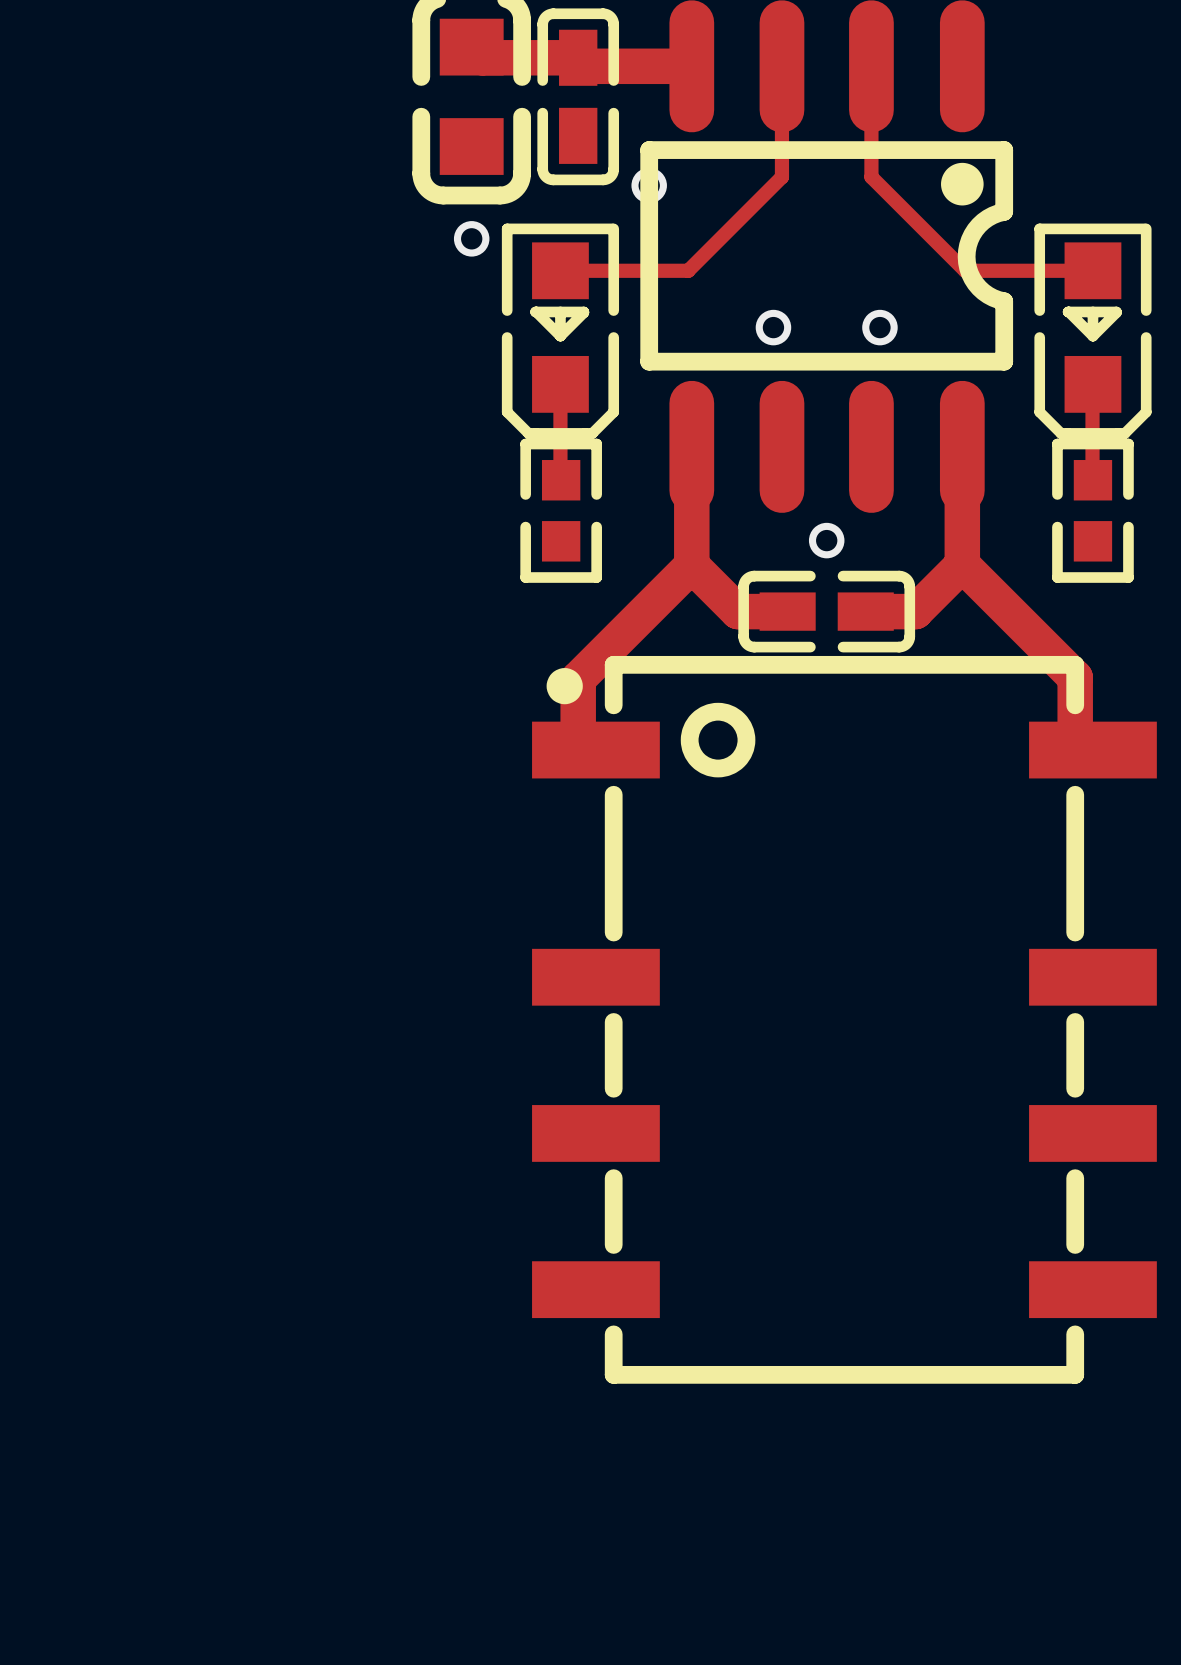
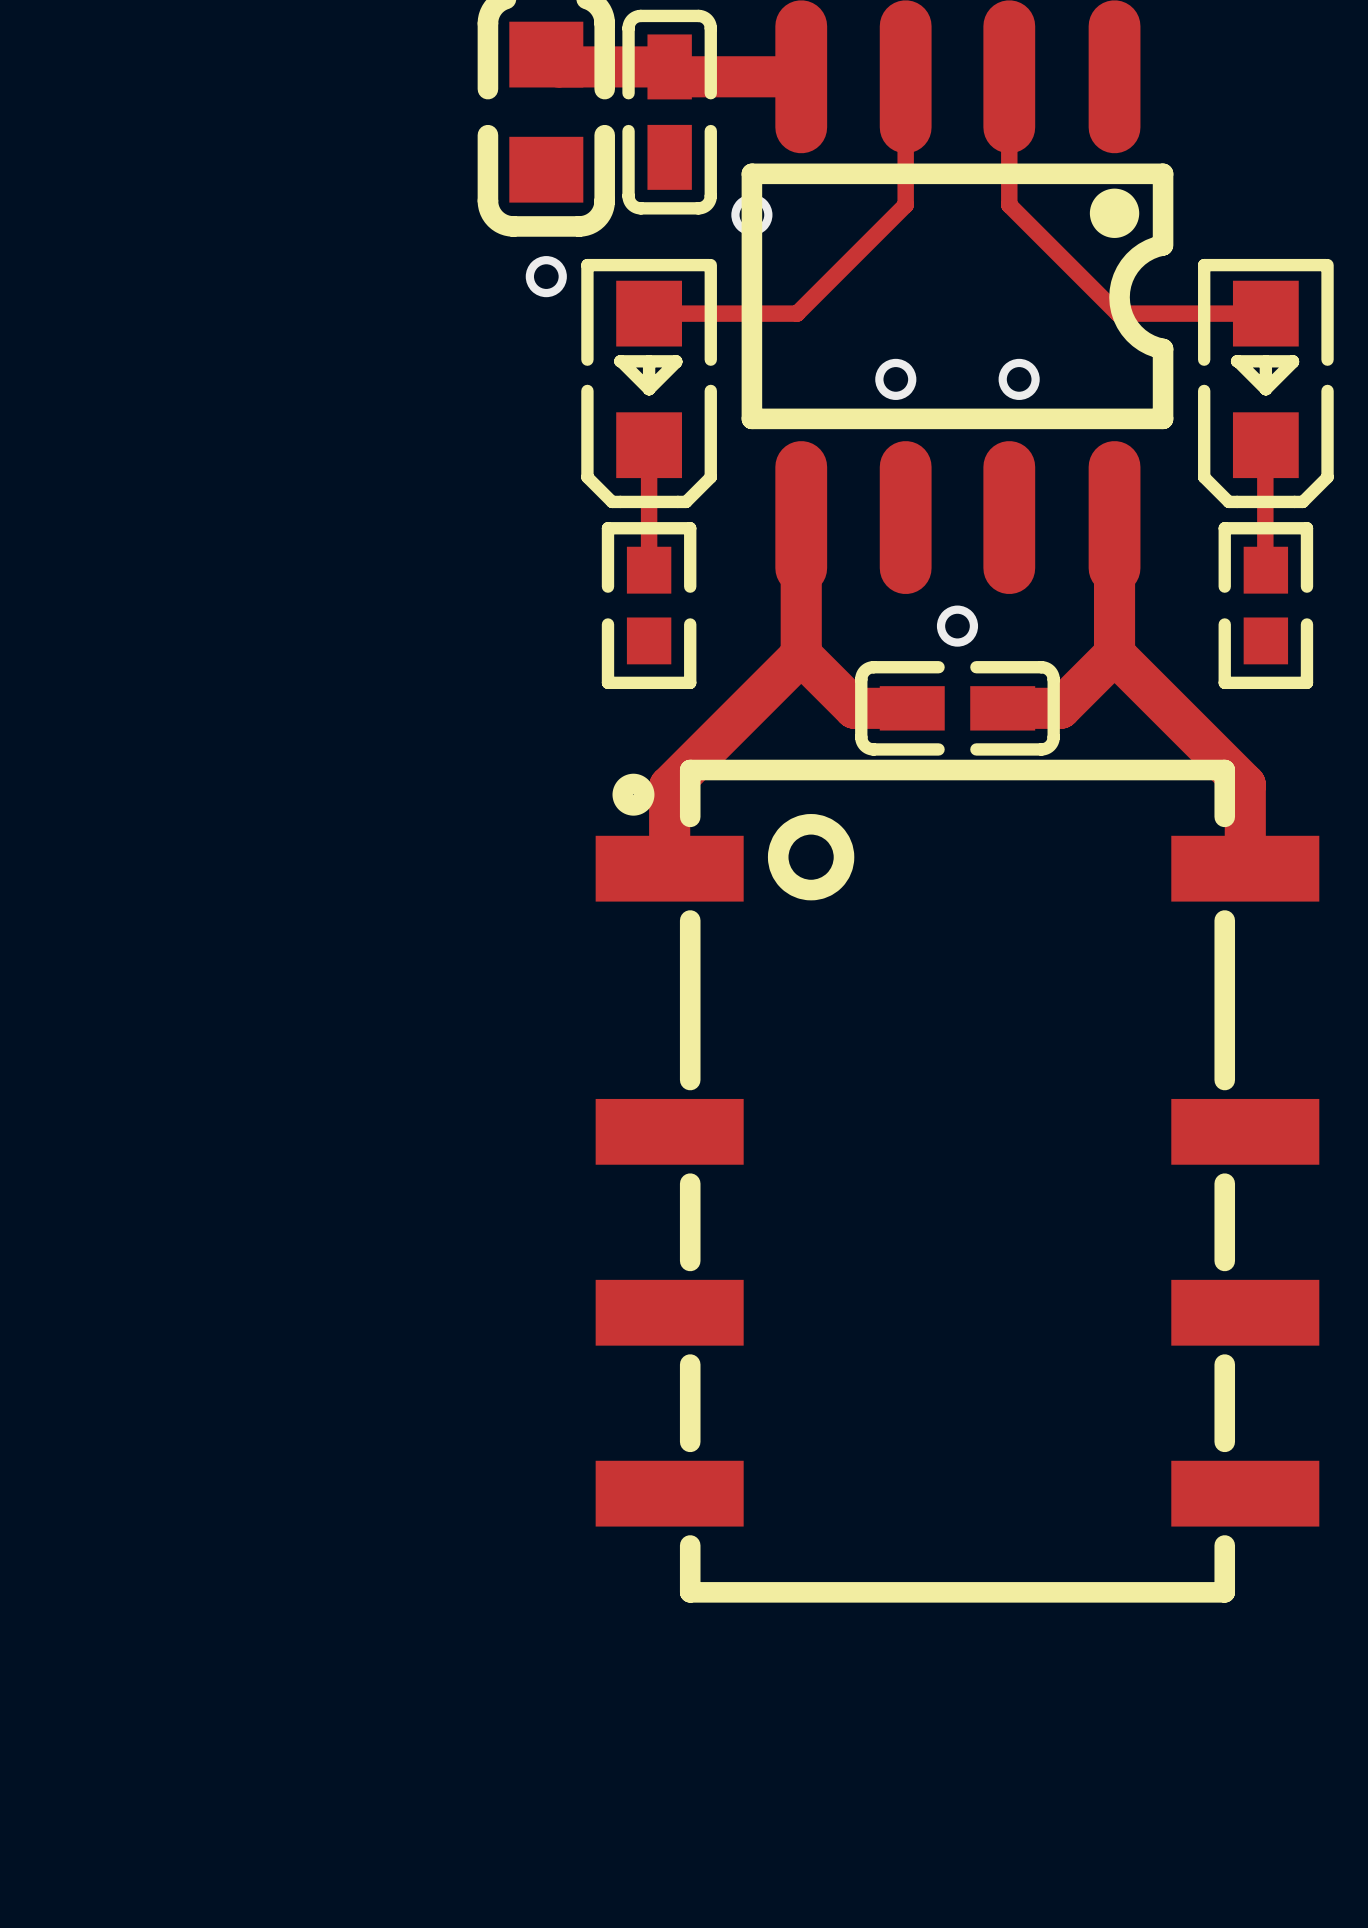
part position: (561, 510) -> (649, 605)
part position: (1092, 510) -> (1265, 605)
part position: (844, 1019) -> (957, 1181)

